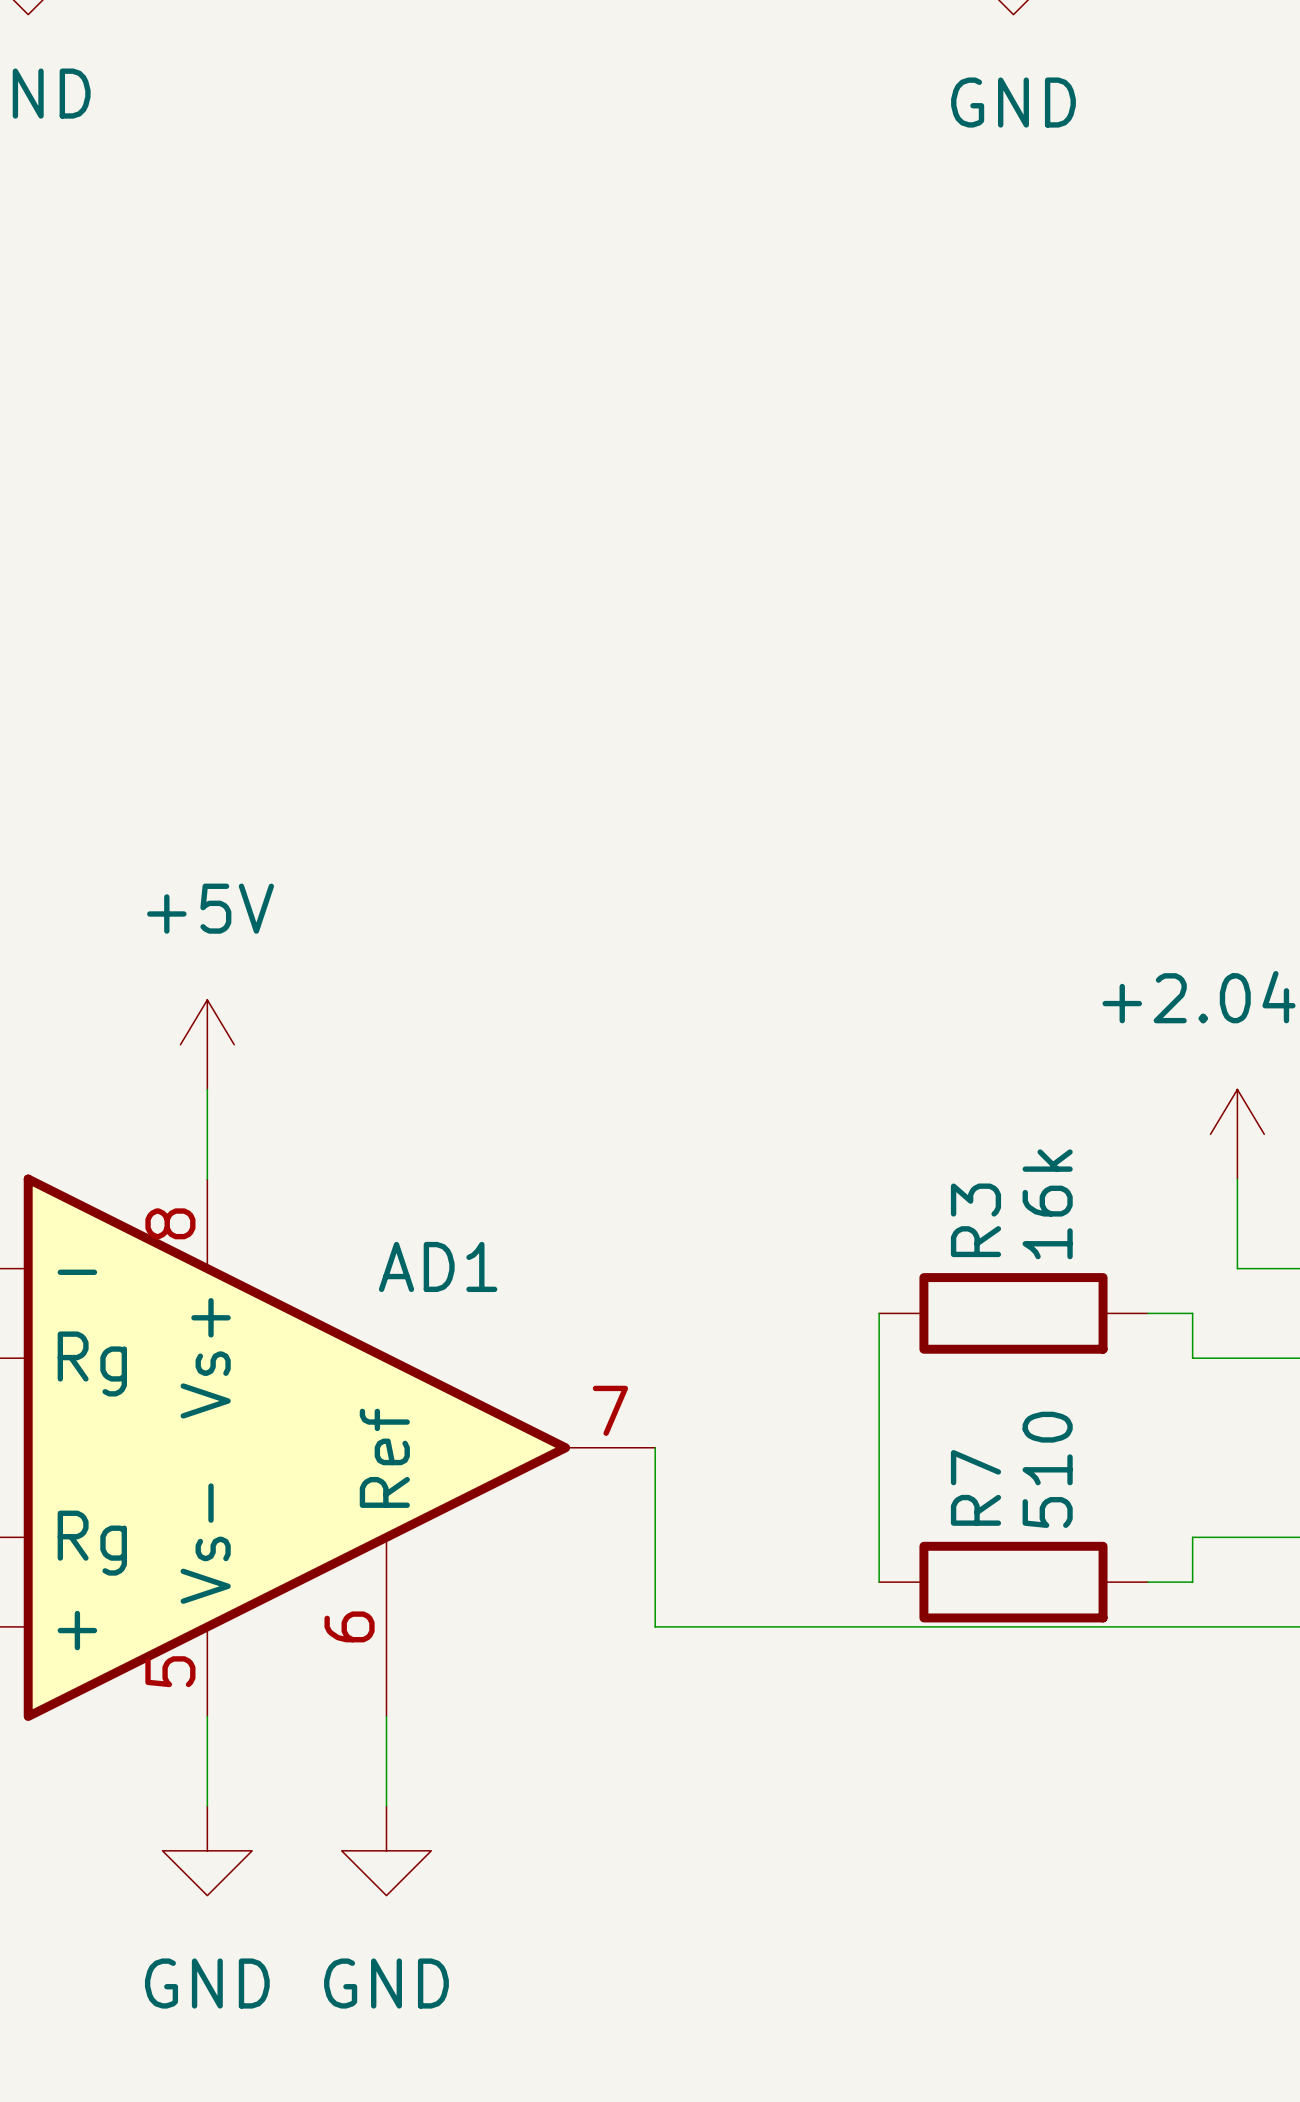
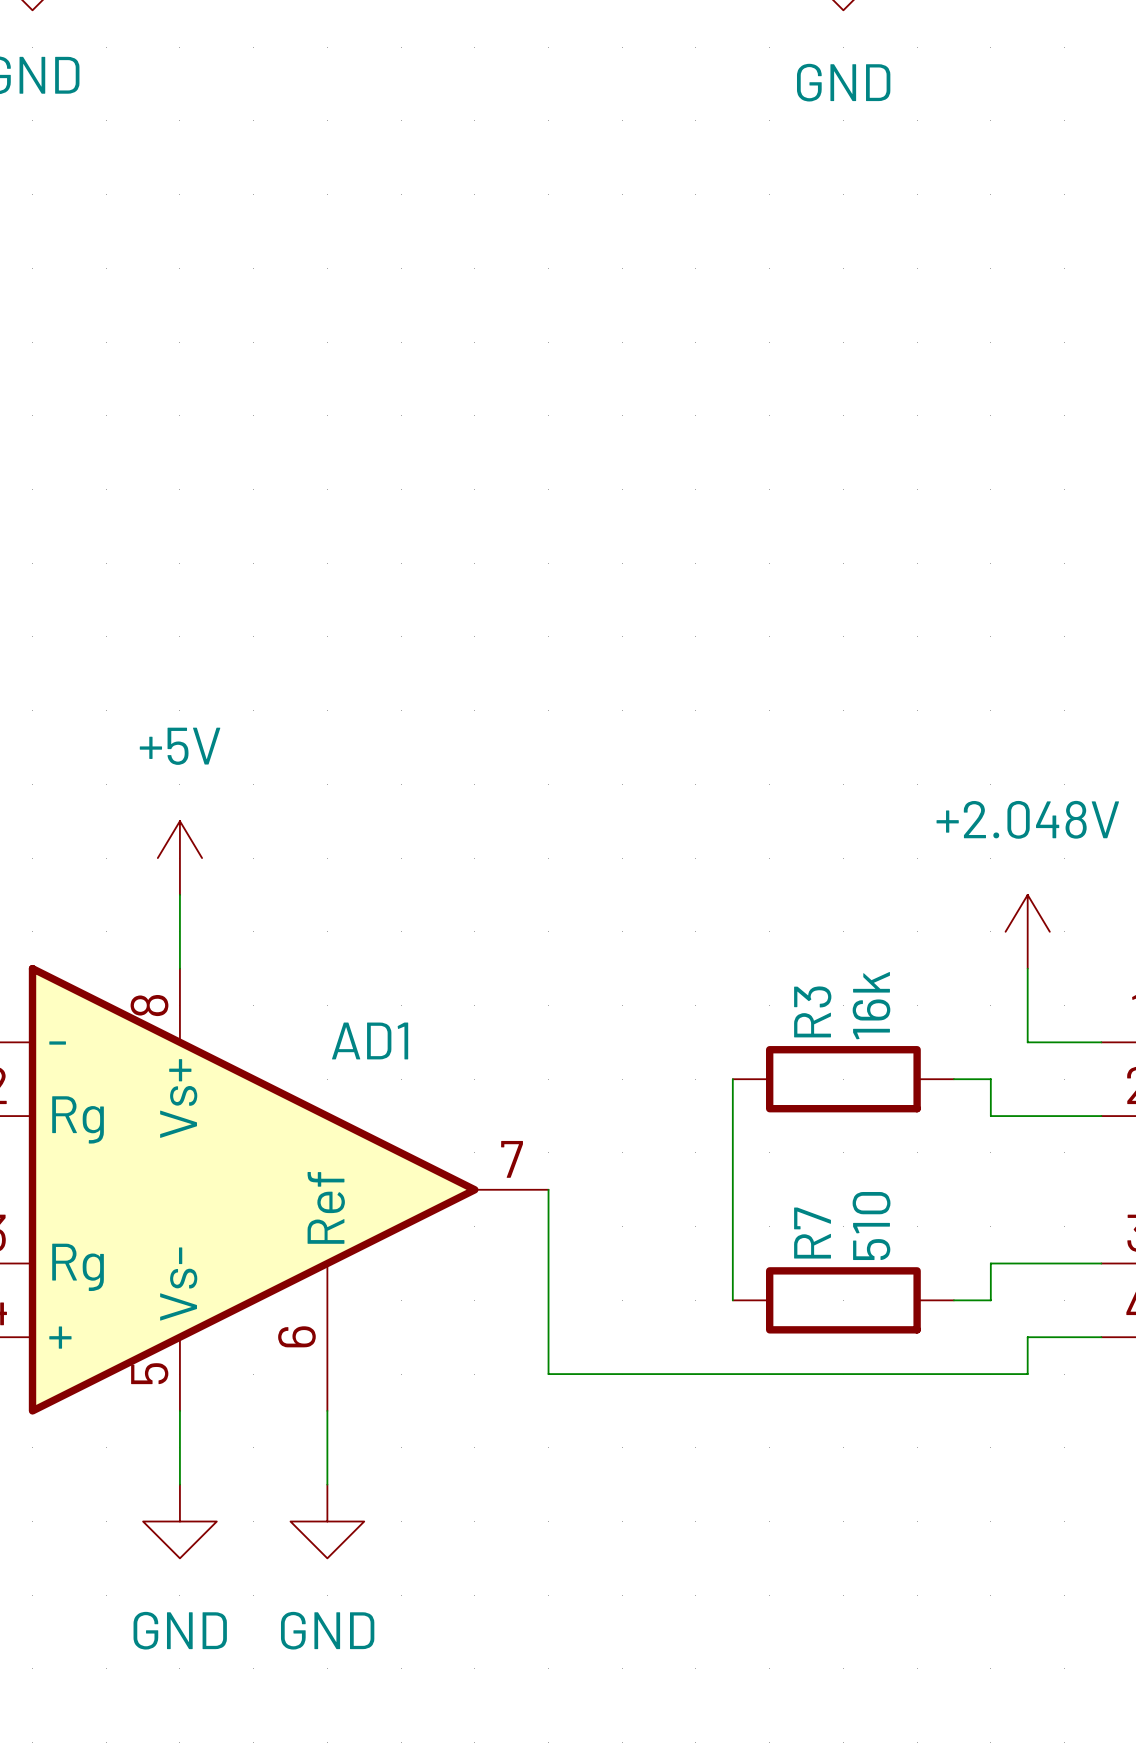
wire: (655, 1626) (1237, 1626) -> (548, 1337) (548, 1374) (1027, 1374) (1027, 1337)

